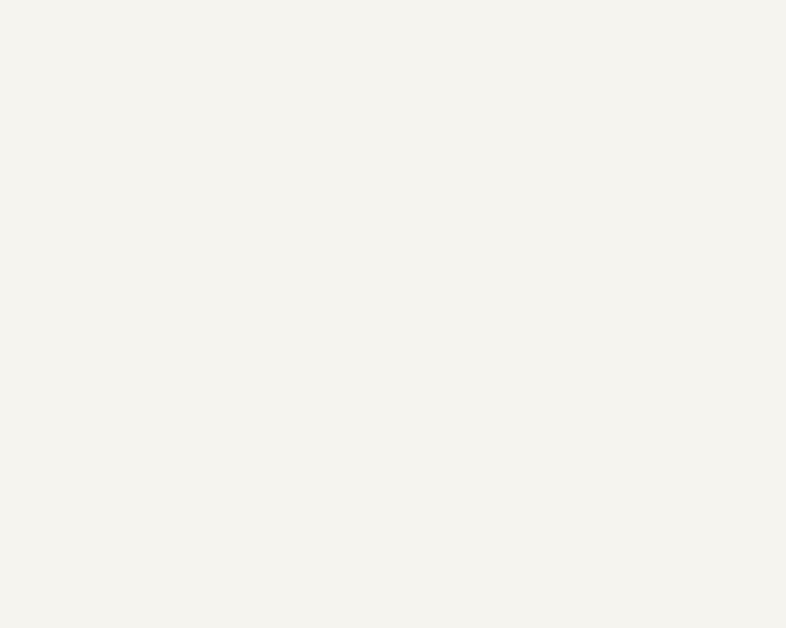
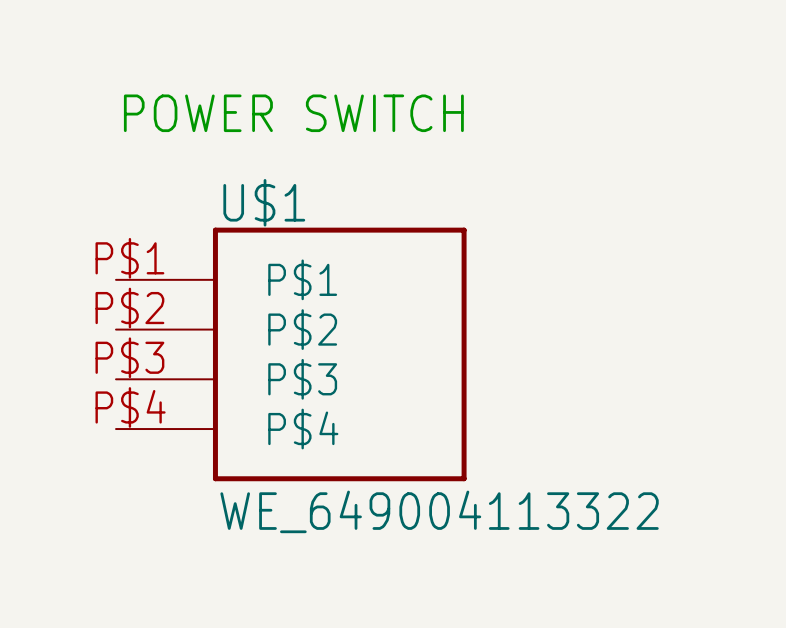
text: none -> POWER SWITCH (293, 113)
U$1: none -> WE_649004113322 (291, 354)

